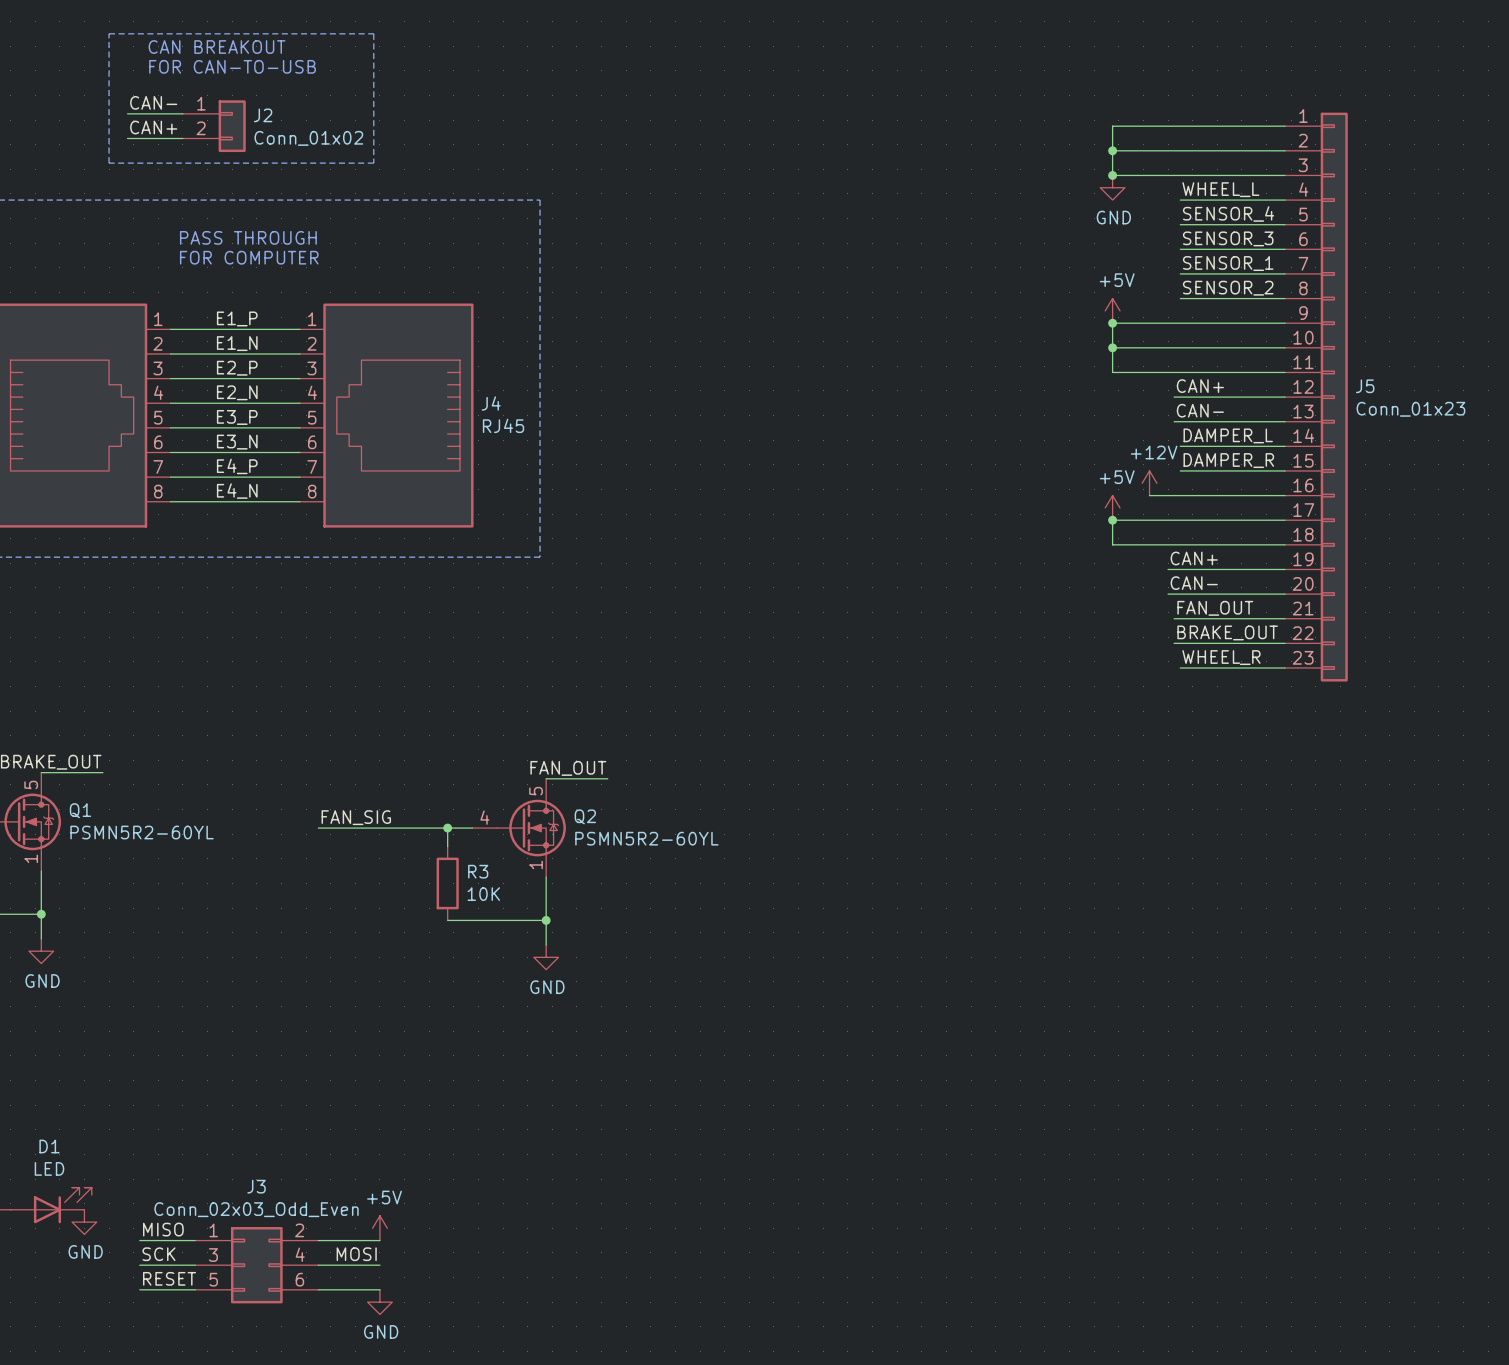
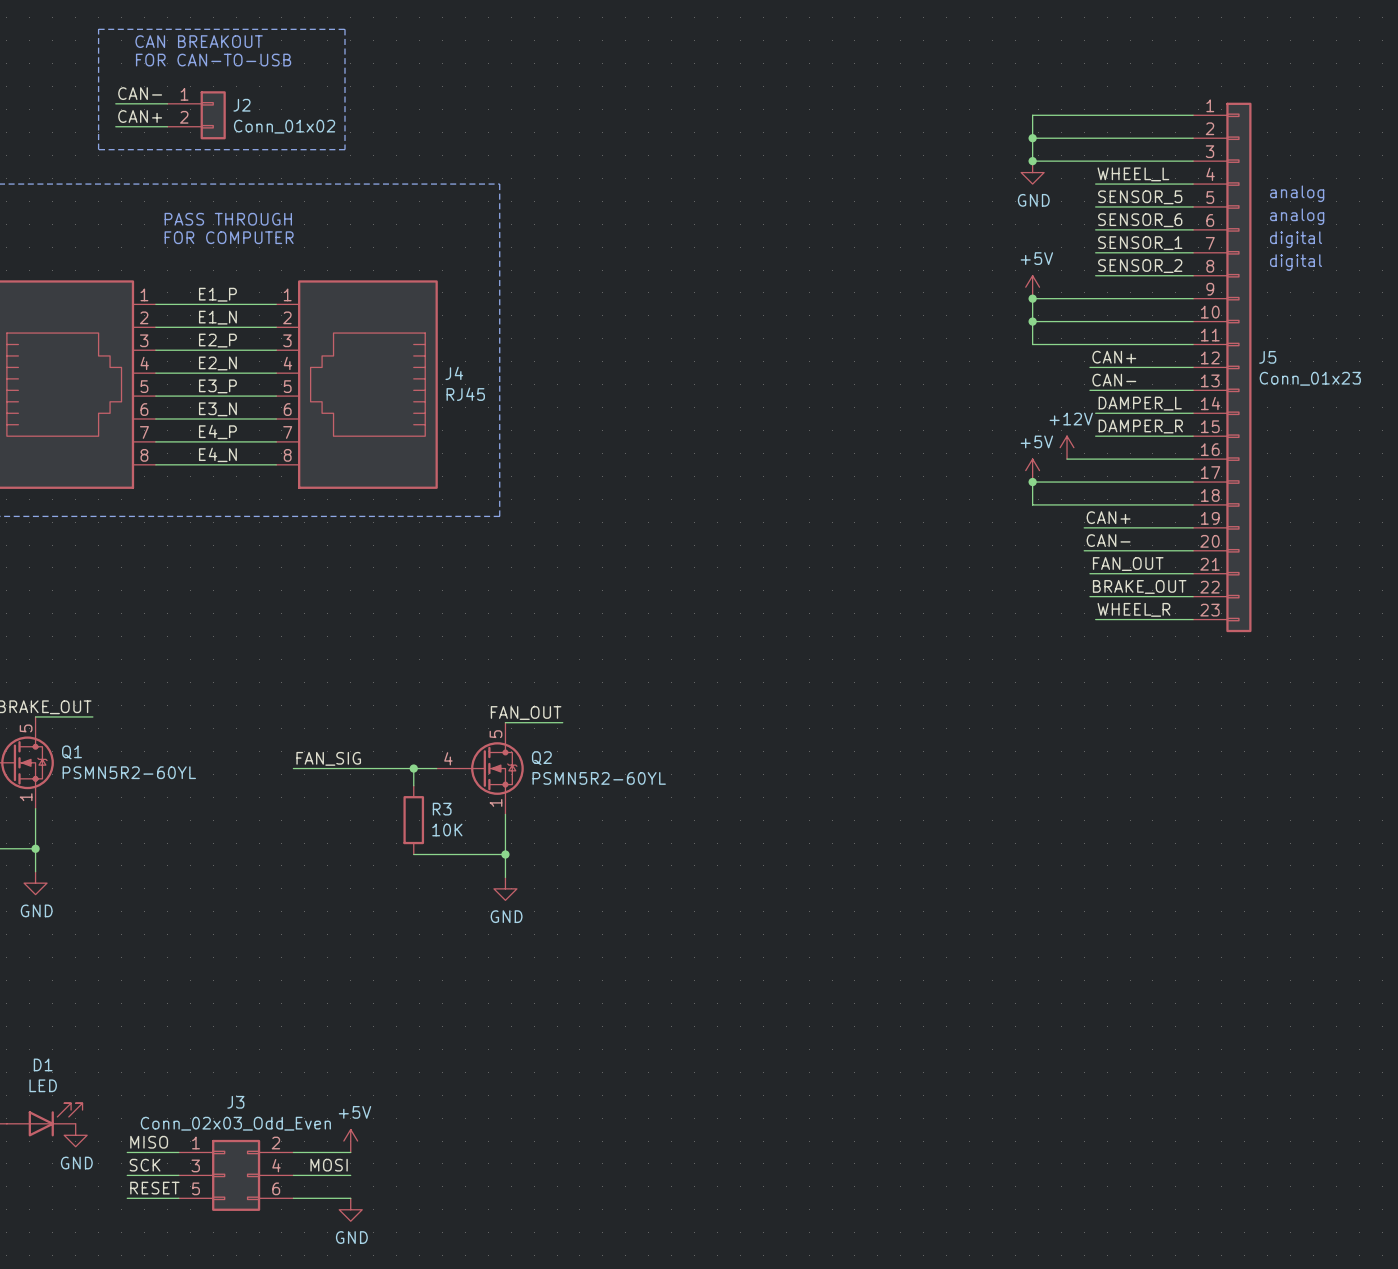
text: none -> analog (1297, 193)
label: SENSOR_4 (1228, 214) -> SENSOR_5 (1140, 197)
text: none -> analog (1297, 216)
label: SENSOR_3 (1228, 238) -> SENSOR_6 (1140, 220)
text: none -> digital (1296, 239)
text: none -> digital (1296, 262)

